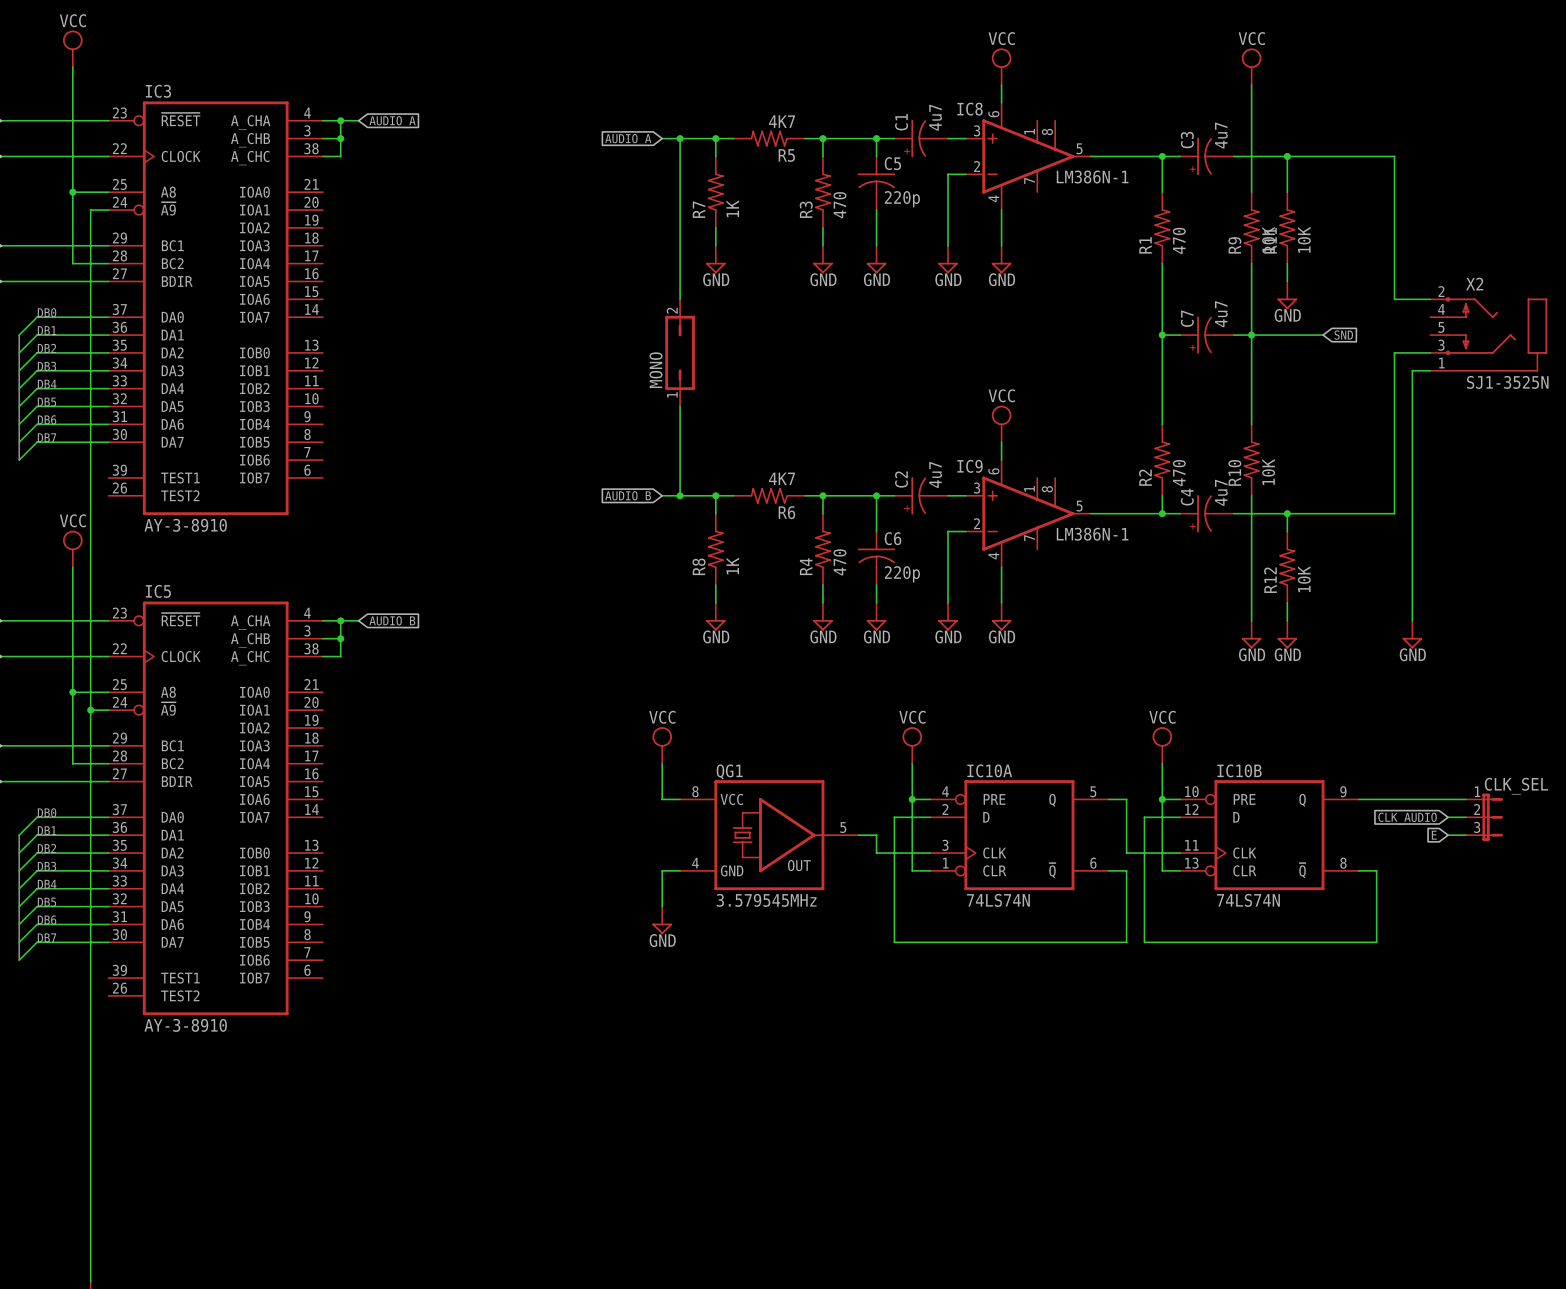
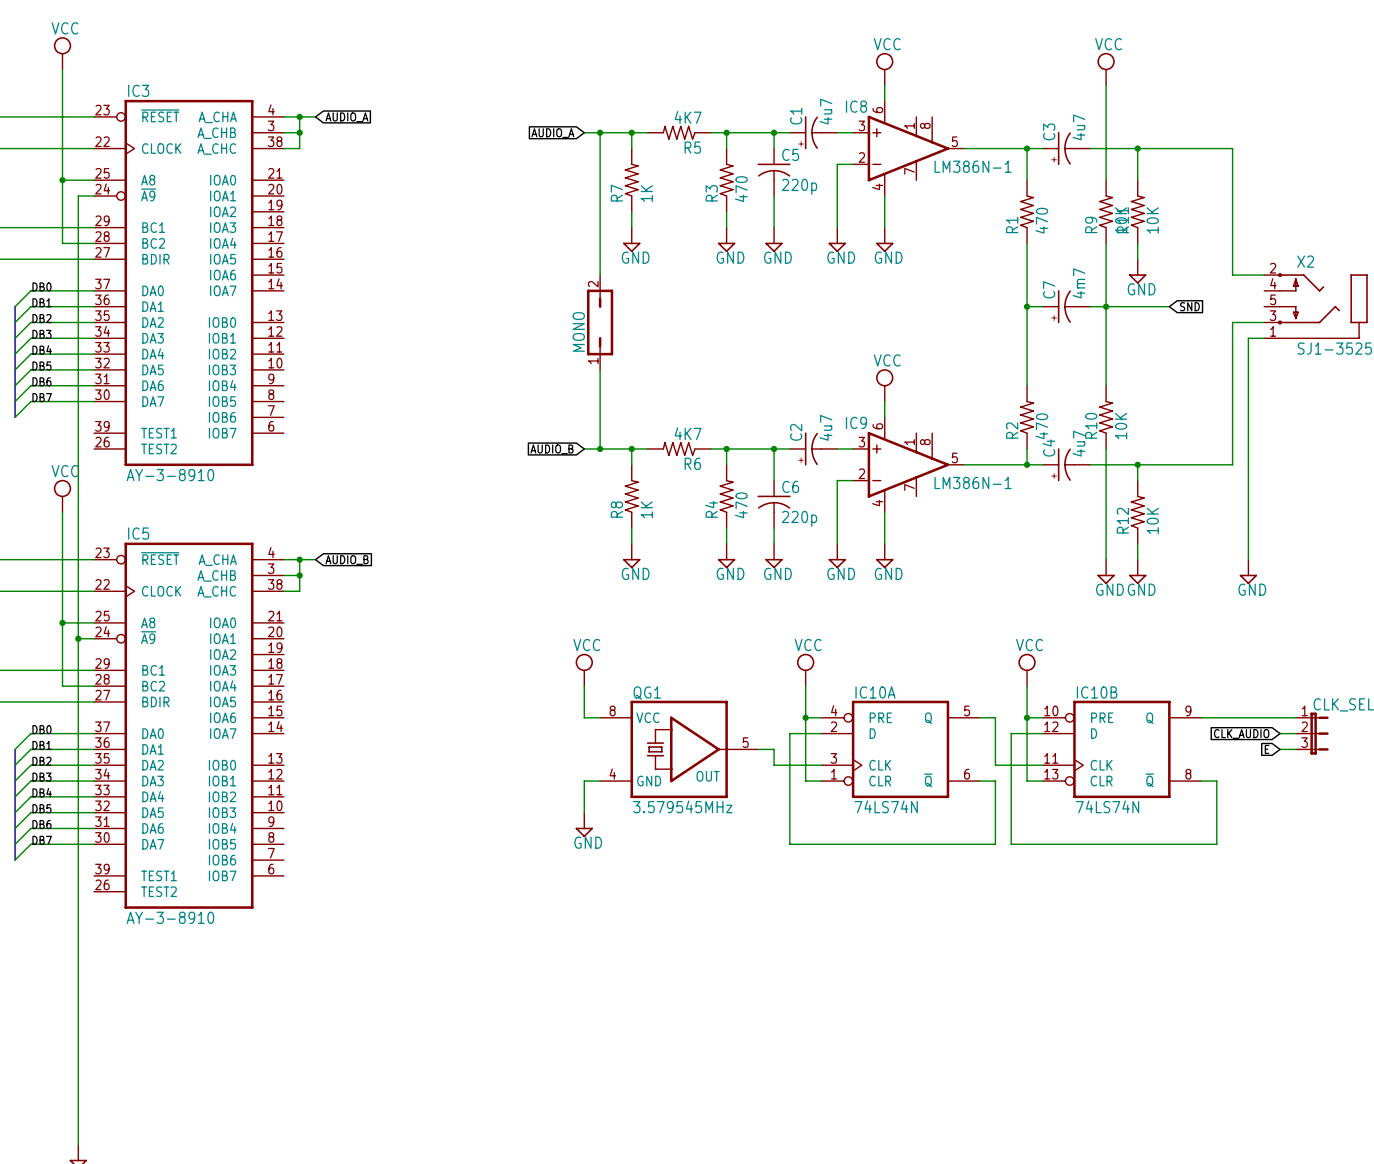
C7 value: 4u7 (1221, 314) -> 4m7 (1078, 283)

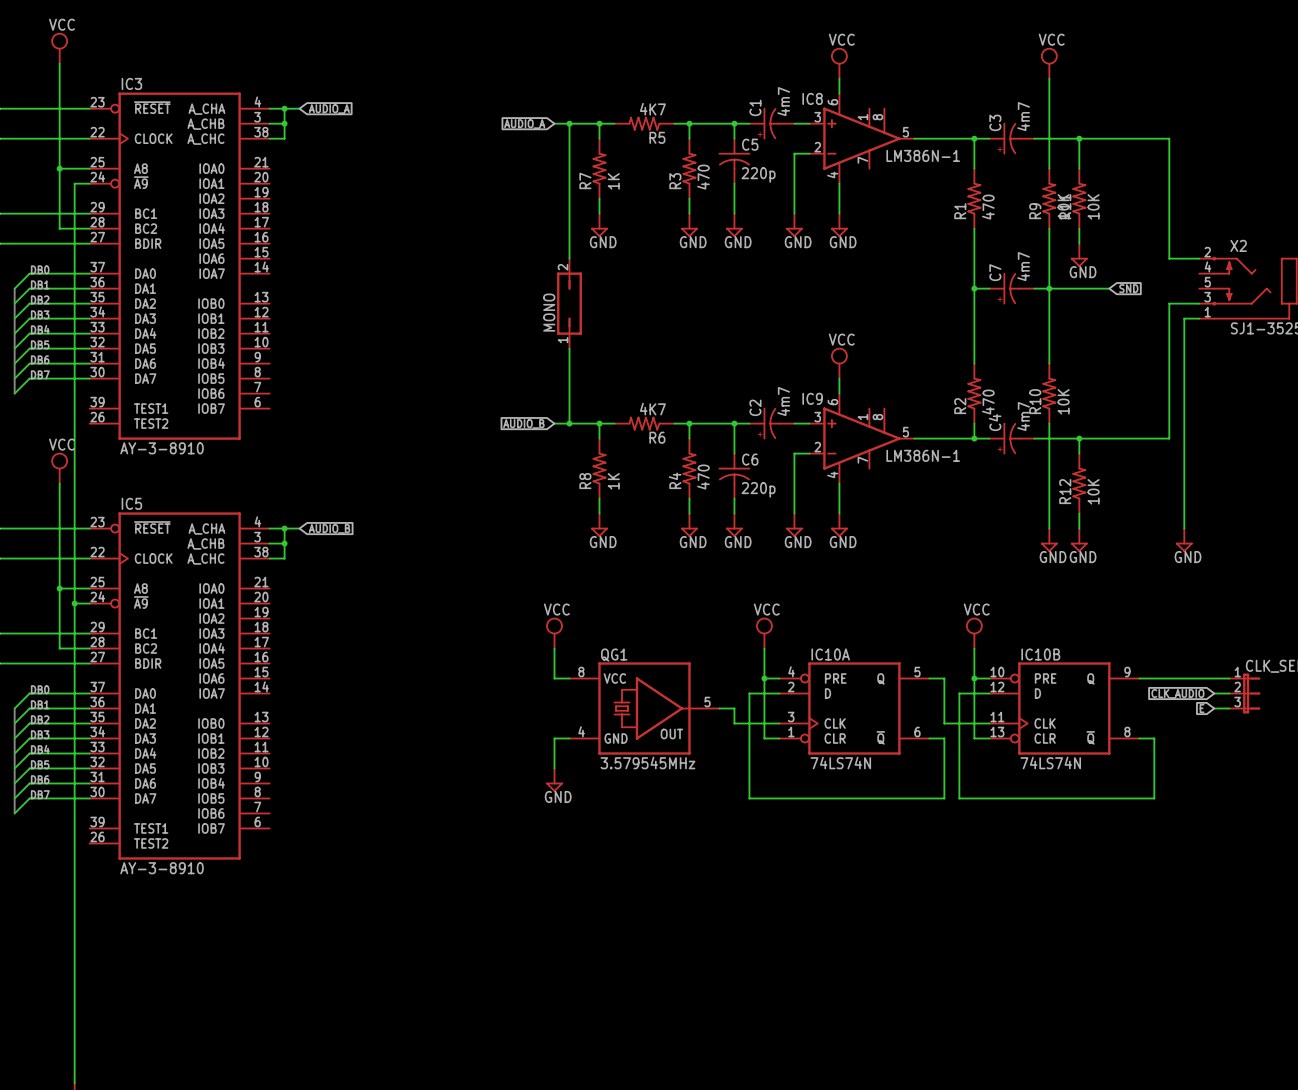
C1 value: 4u7 (825, 111) -> 4m7 (783, 101)
C3 value: 4u7 (1078, 127) -> 4m7 (1023, 116)
C2 value: 4u7 (825, 427) -> 4m7 (783, 401)
C4 value: 4u7 (1078, 443) -> 4m7 (1023, 416)

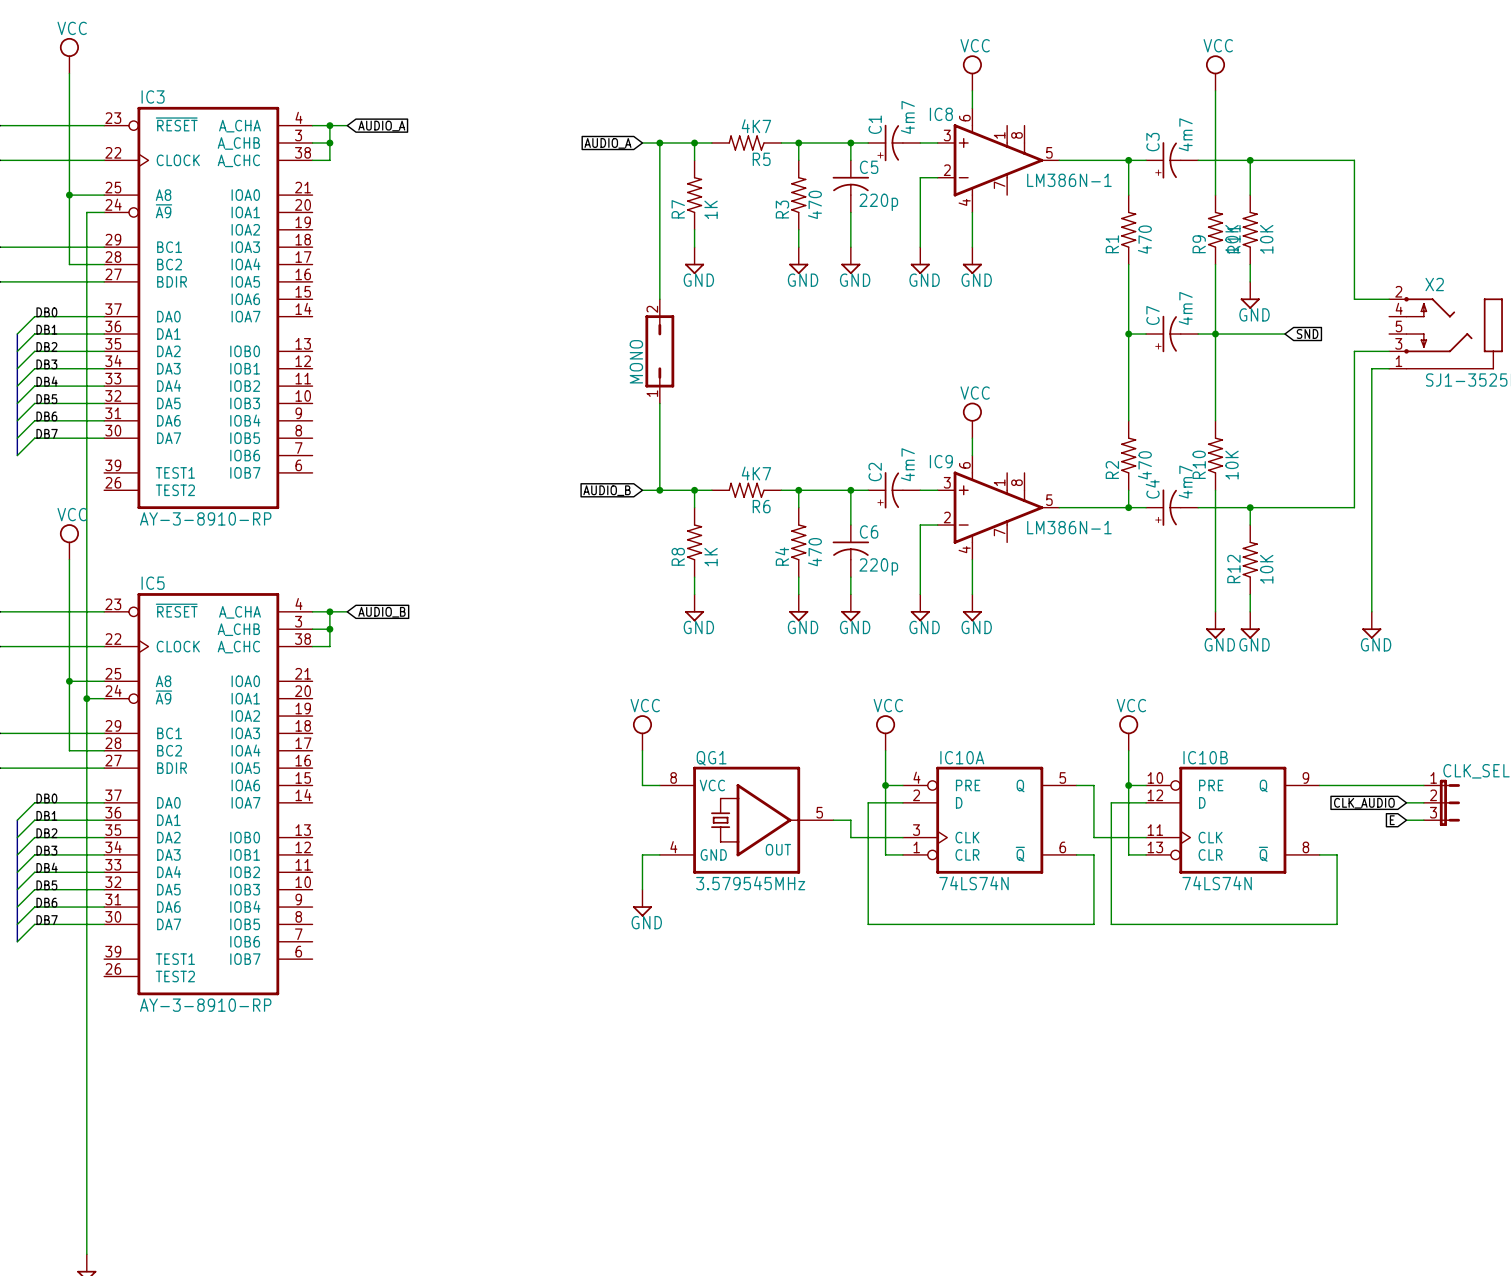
IC3 value: AY-3-8910 (162, 448) -> AY-3-8910-RP (205, 518)
IC5 value: AY-3-8910 (162, 868) -> AY-3-8910-RP (205, 1005)

